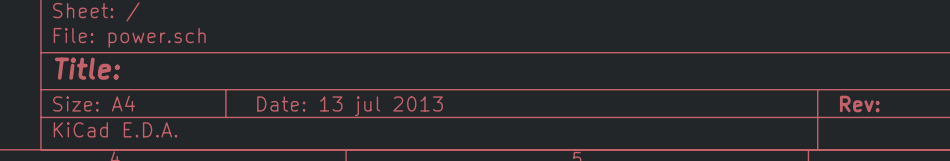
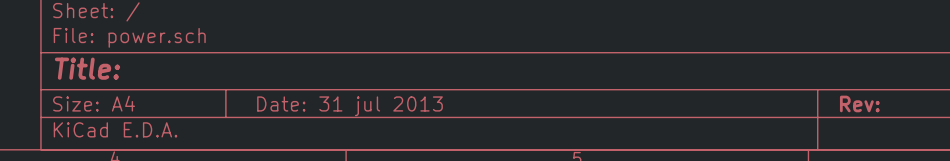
title block: Date: 13 jul 2013 (350, 106) -> Date: 31 jul 2013 (350, 106)

